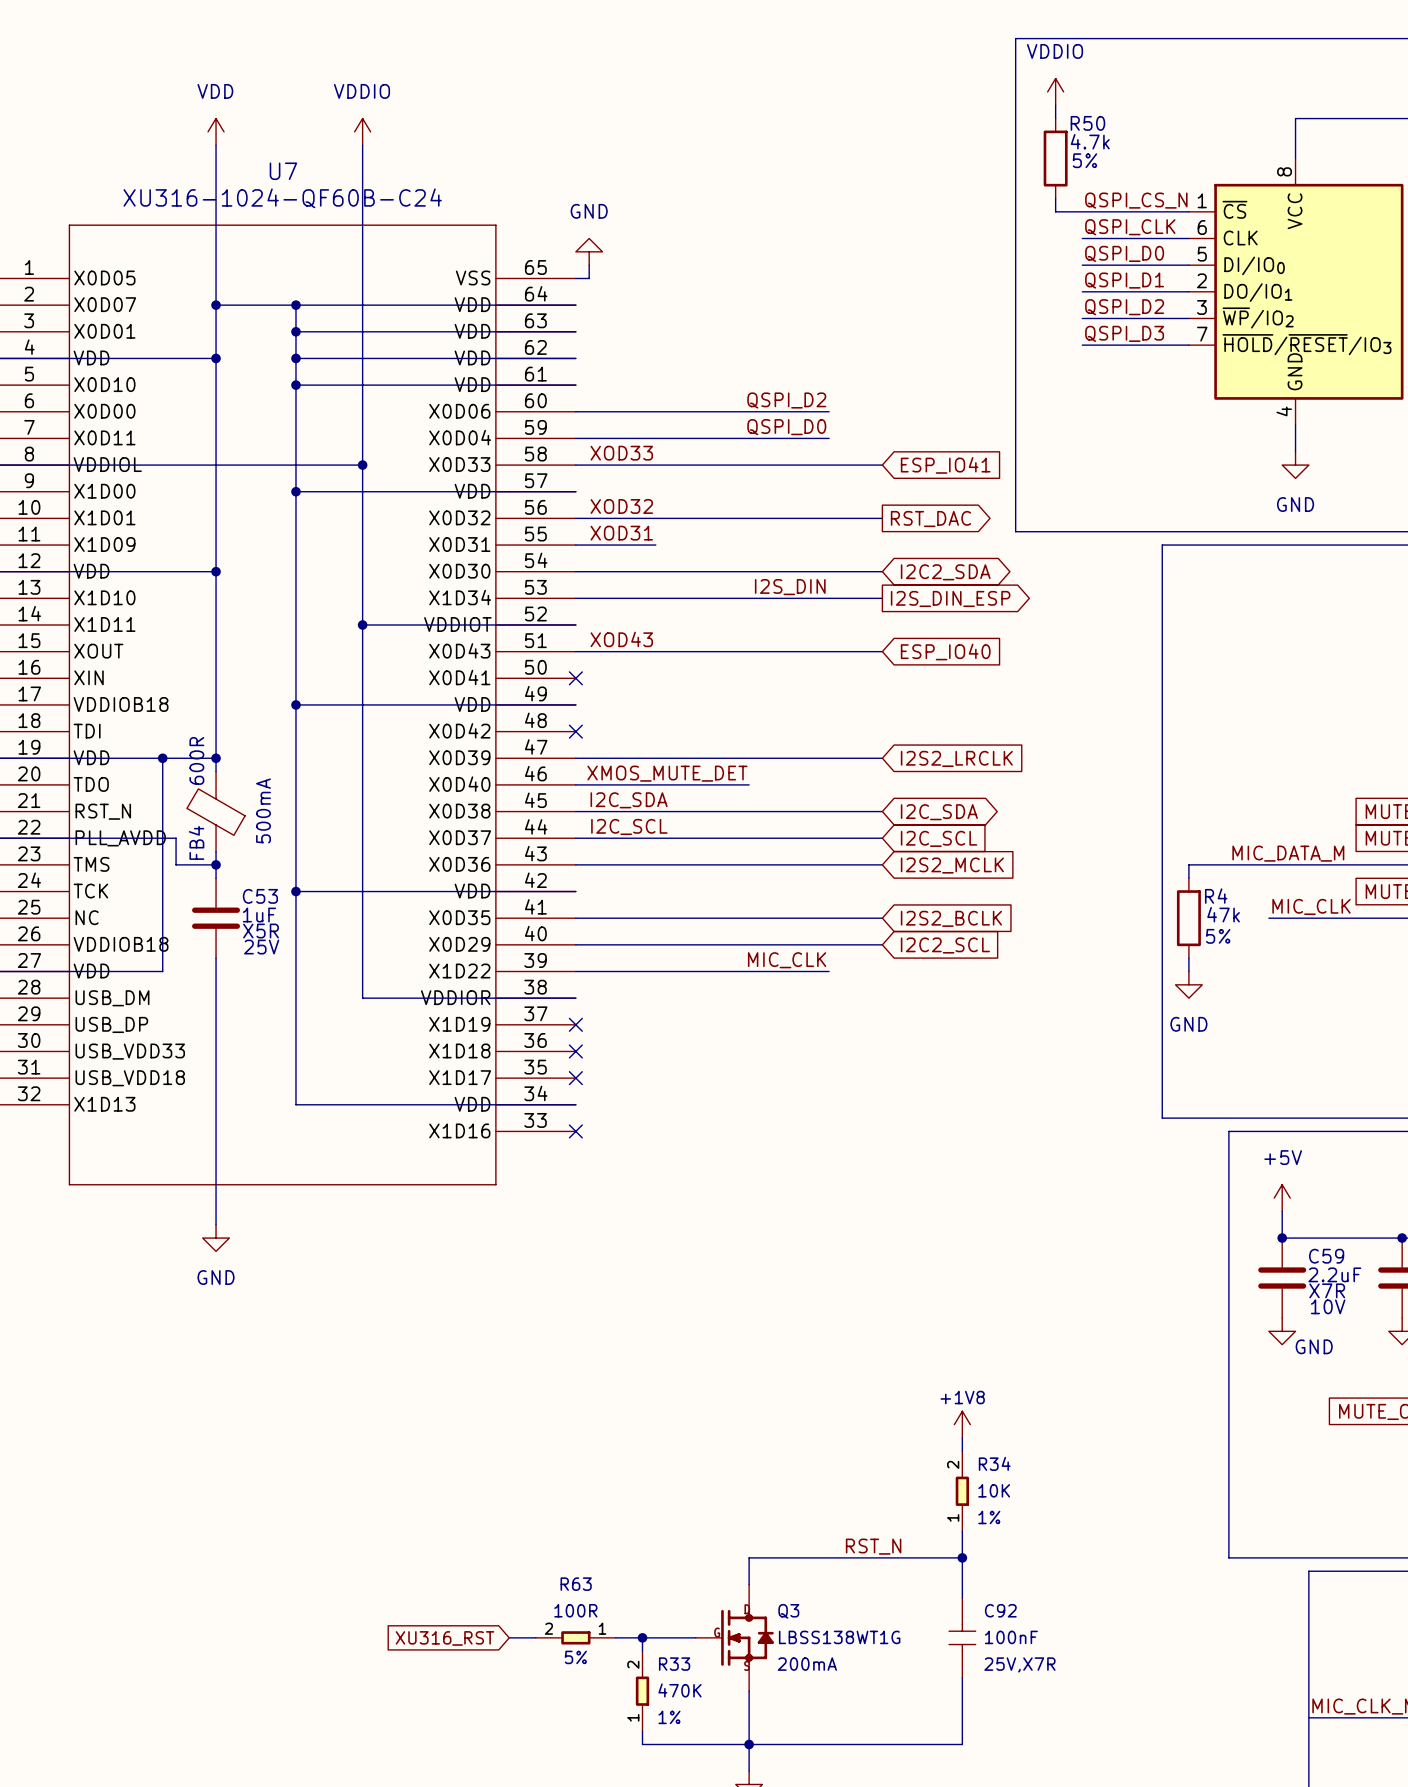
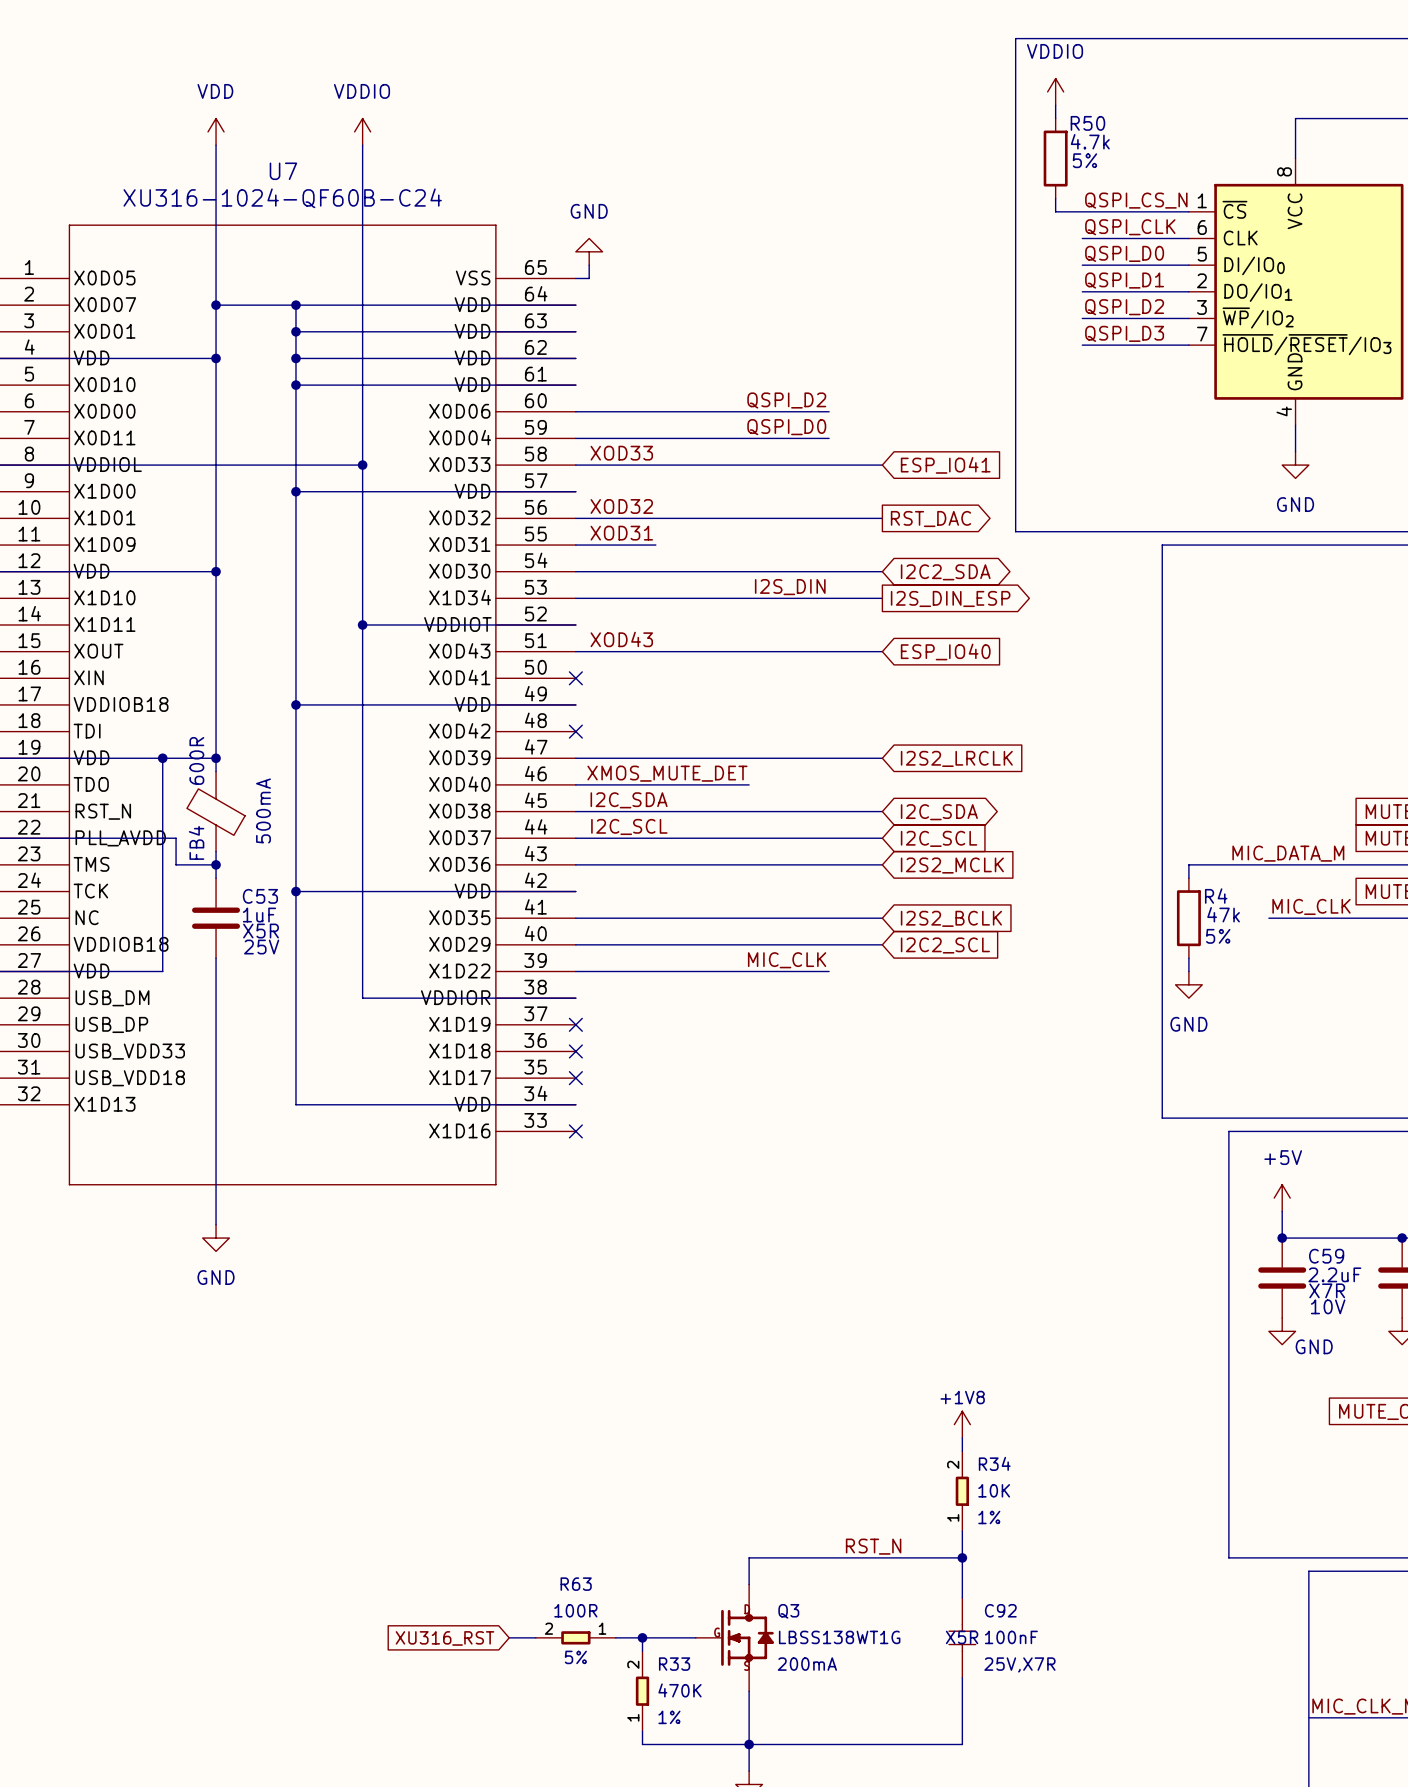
C92 text: none -> X5R (962, 1637)

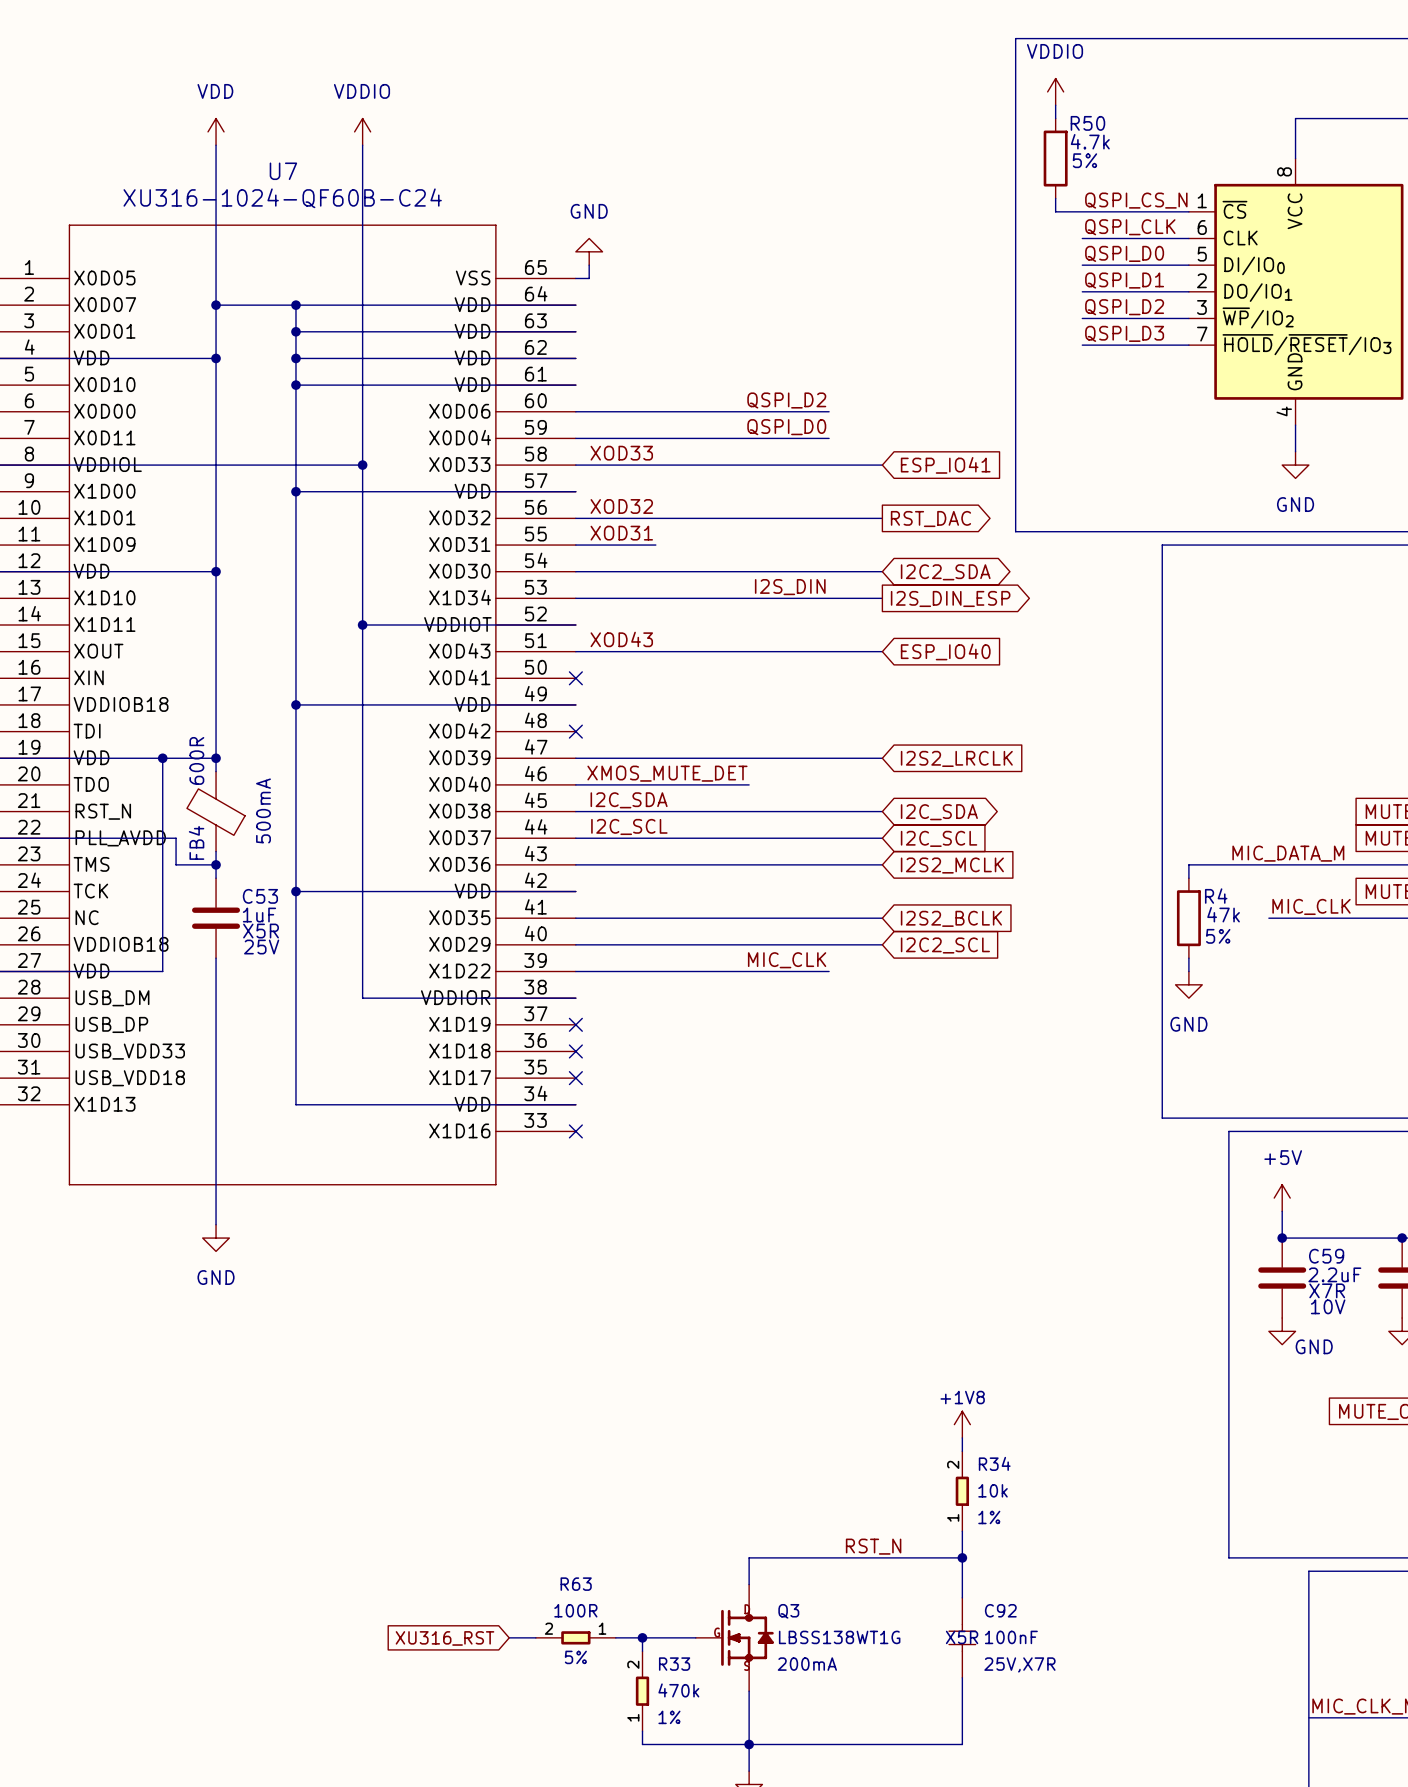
R34 value: 10K (994, 1490) -> 10k (993, 1490)
R33 value: 470K (680, 1690) -> 470k (678, 1690)

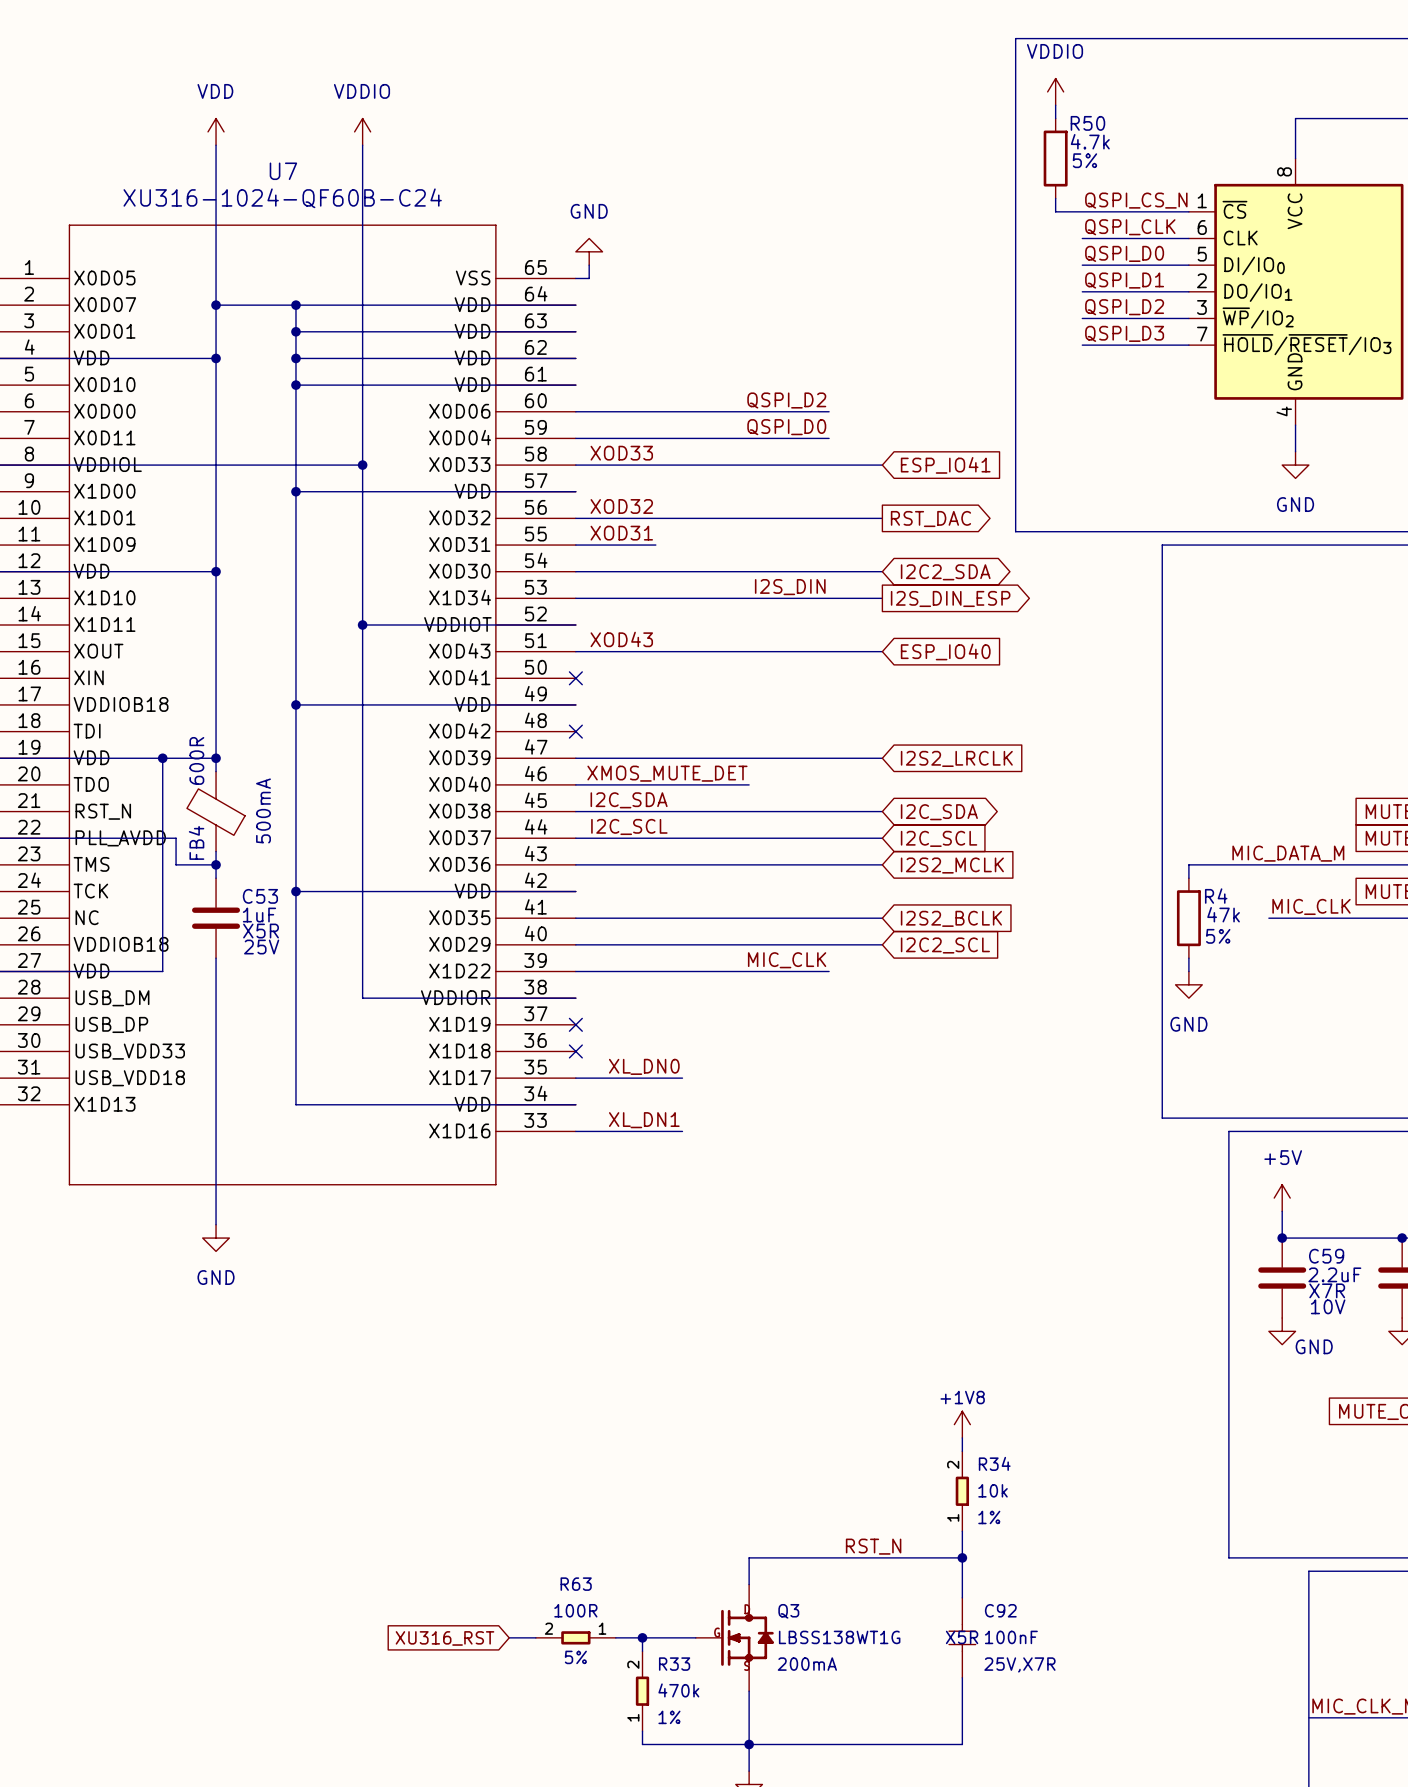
label: none -> XL_DN0 (644, 1066)
wire: none -> (575, 1078) (682, 1078)
no-connect mark: (575, 1078) -> none
label: none -> XL_DN1 (644, 1120)
wire: none -> (575, 1131) (682, 1131)
no-connect mark: (575, 1131) -> none

